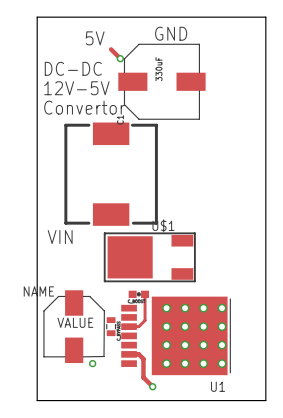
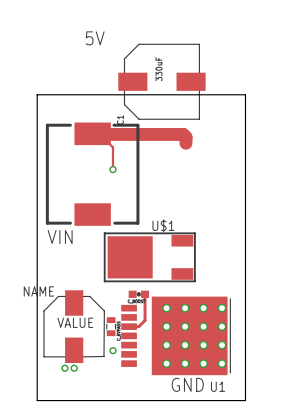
text: GND (171, 33) -> none
track: (111, 49) (120, 58) -> none
via: (120, 58) -> none
text: DC-DC (73, 68) -> none
text: 12V-5V (76, 88) -> none
board edge: (37, 94) (37, 17) (265, 17) (265, 400) (245, 400) -> (37, 94) (245, 94) (245, 400)
text: Convertor (84, 107) -> none
track: none -> (98, 134) (183, 134) (185, 137) (185, 143)
track: none -> (97, 135) (103, 138) (112, 147) (112, 169)
via: none -> (112, 169)
part position: (111, 174) -> (92, 174)
via: none -> (112, 350)
track: (133, 354) (138, 354) (143, 359) (143, 377) (152, 386) -> none
via: (92, 363) -> none
via: none -> (64, 368)
via: none -> (74, 368)
text: none -> GND (187, 384)
via: (152, 386) -> none

